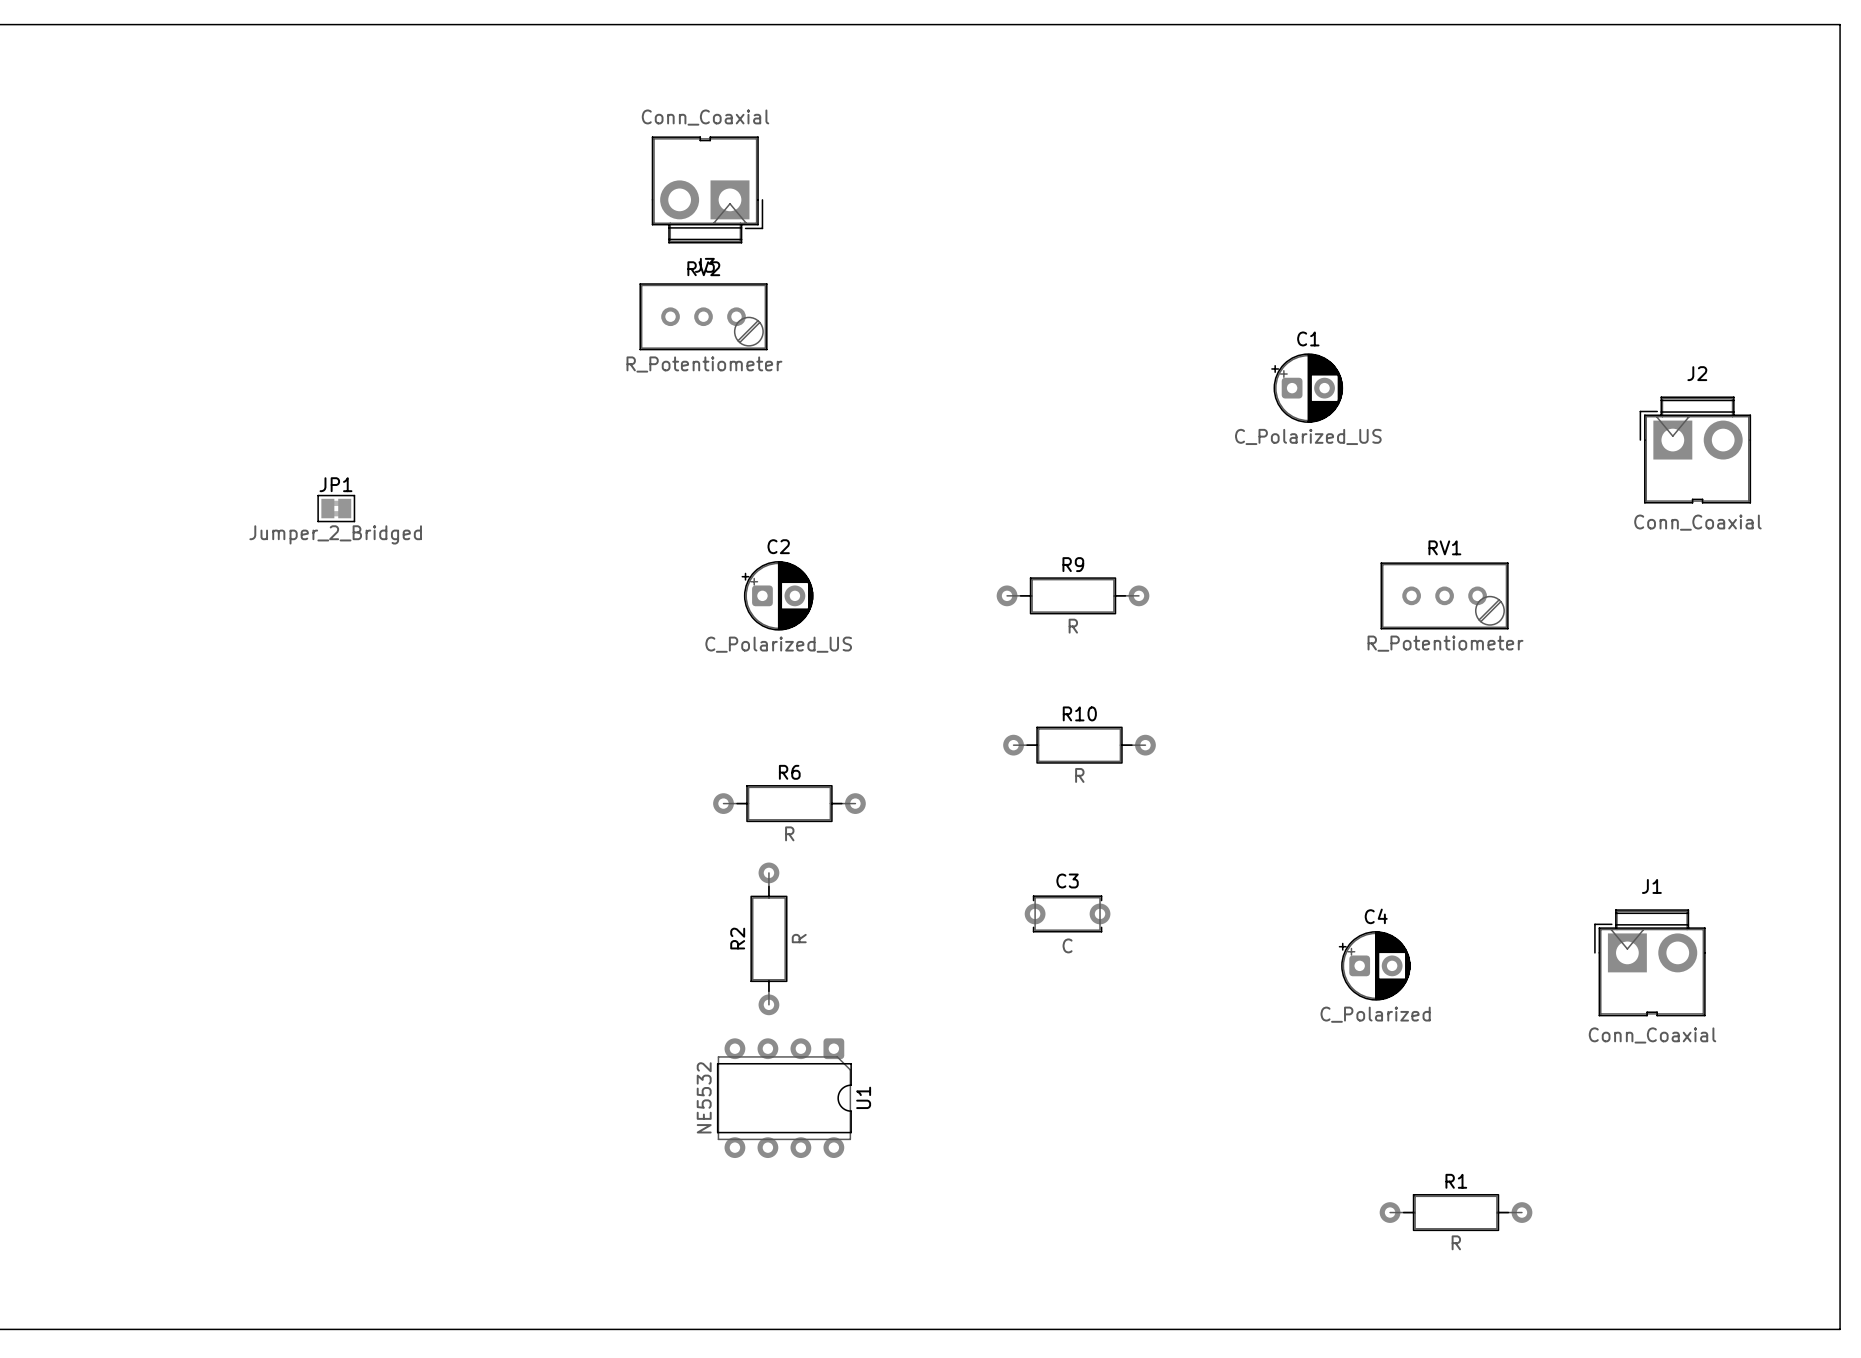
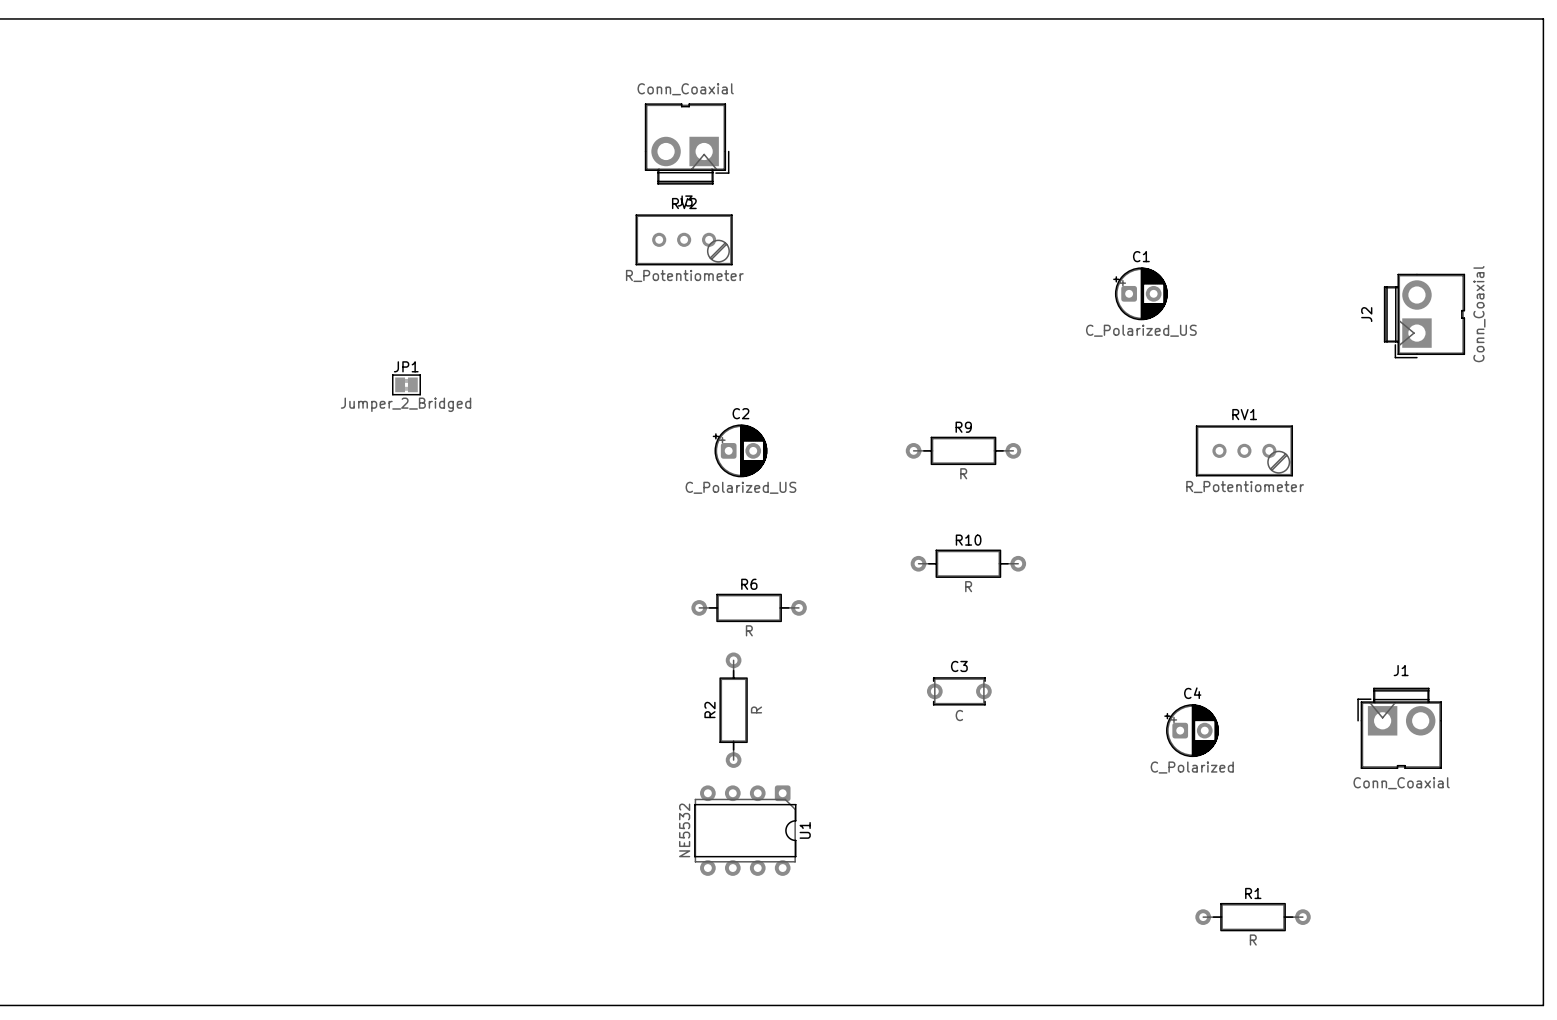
J2 rotation: 0° (1695, 449) -> 90° counterclockwise (1424, 316)

